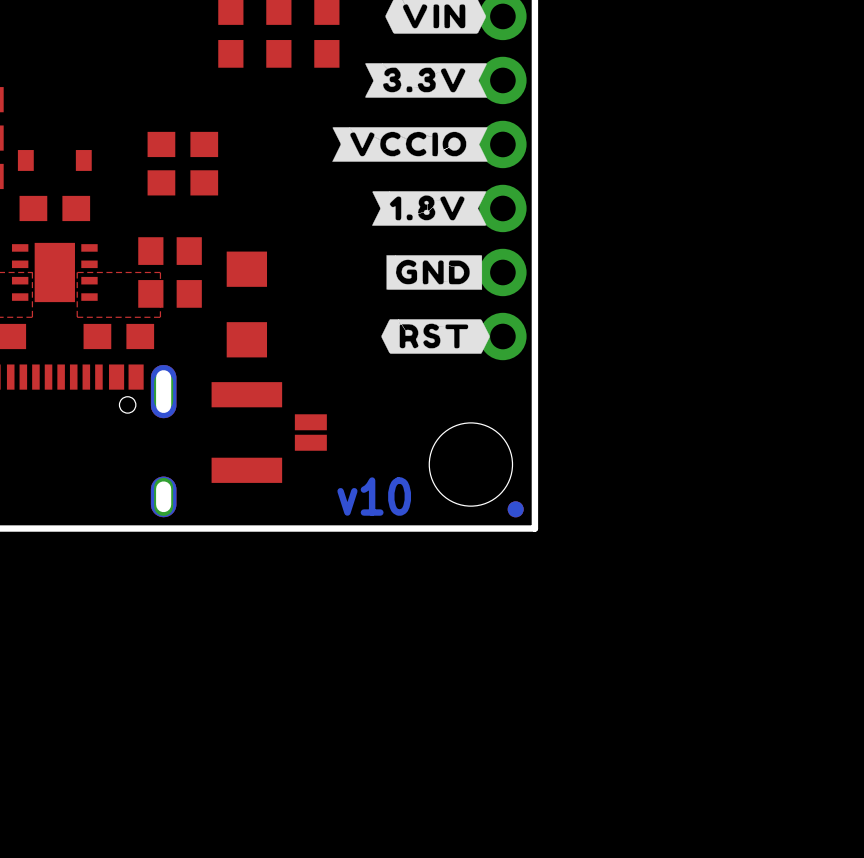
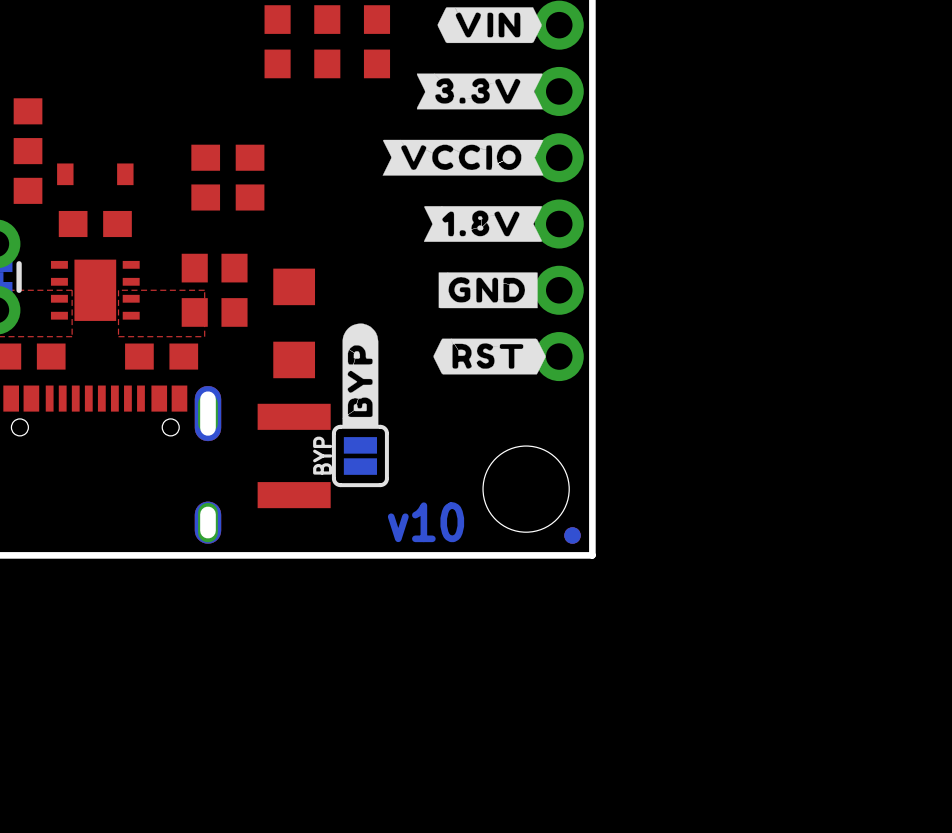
drawing: none -> [342, 323, 379, 428]
BYP side: top (310, 432) -> bottom (360, 455)

